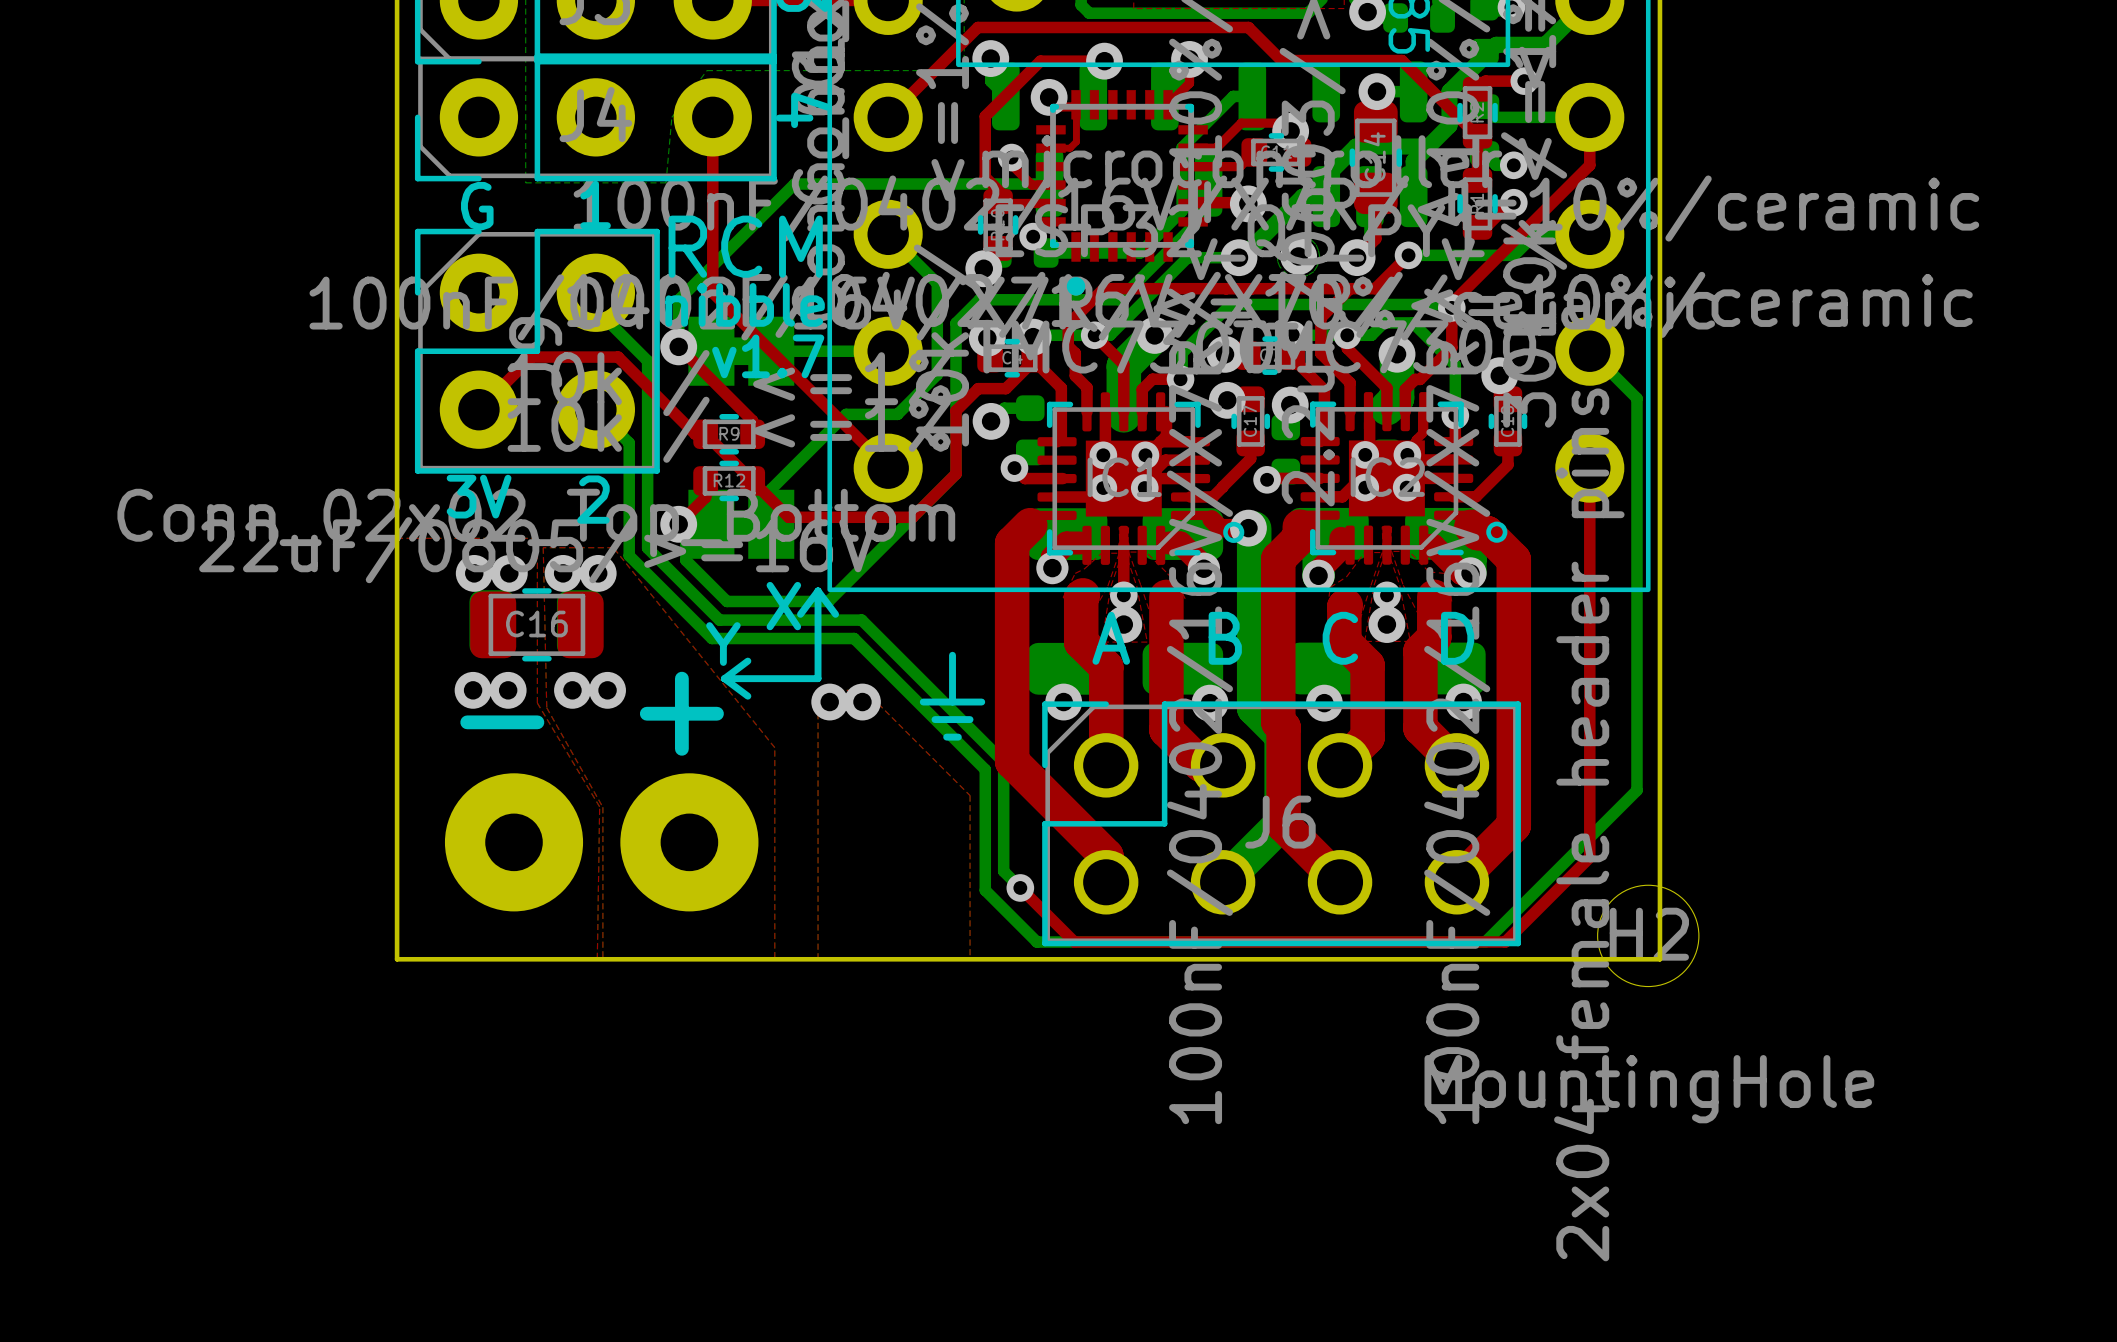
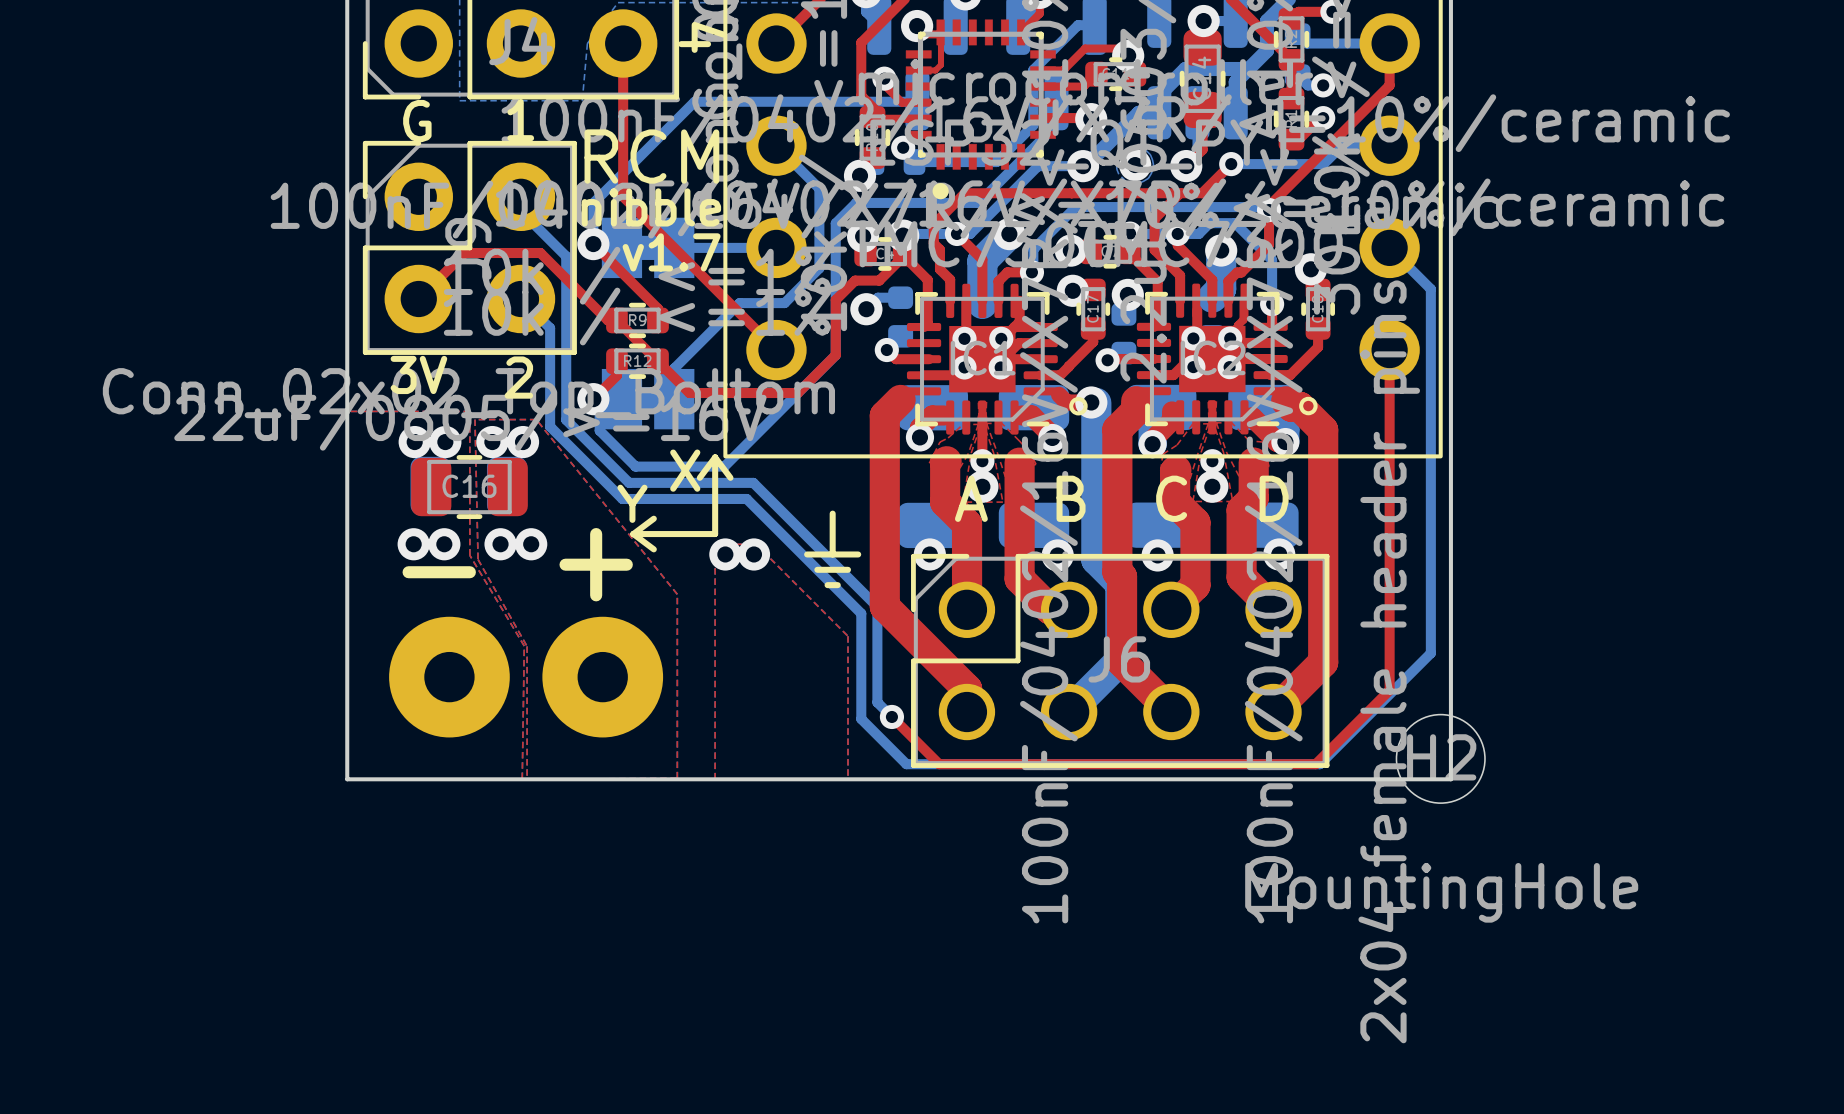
bottom track: (1636, 790) (1485, 942) -> (1430, 631) (1430, 653) (1319, 764) (1298, 764)

